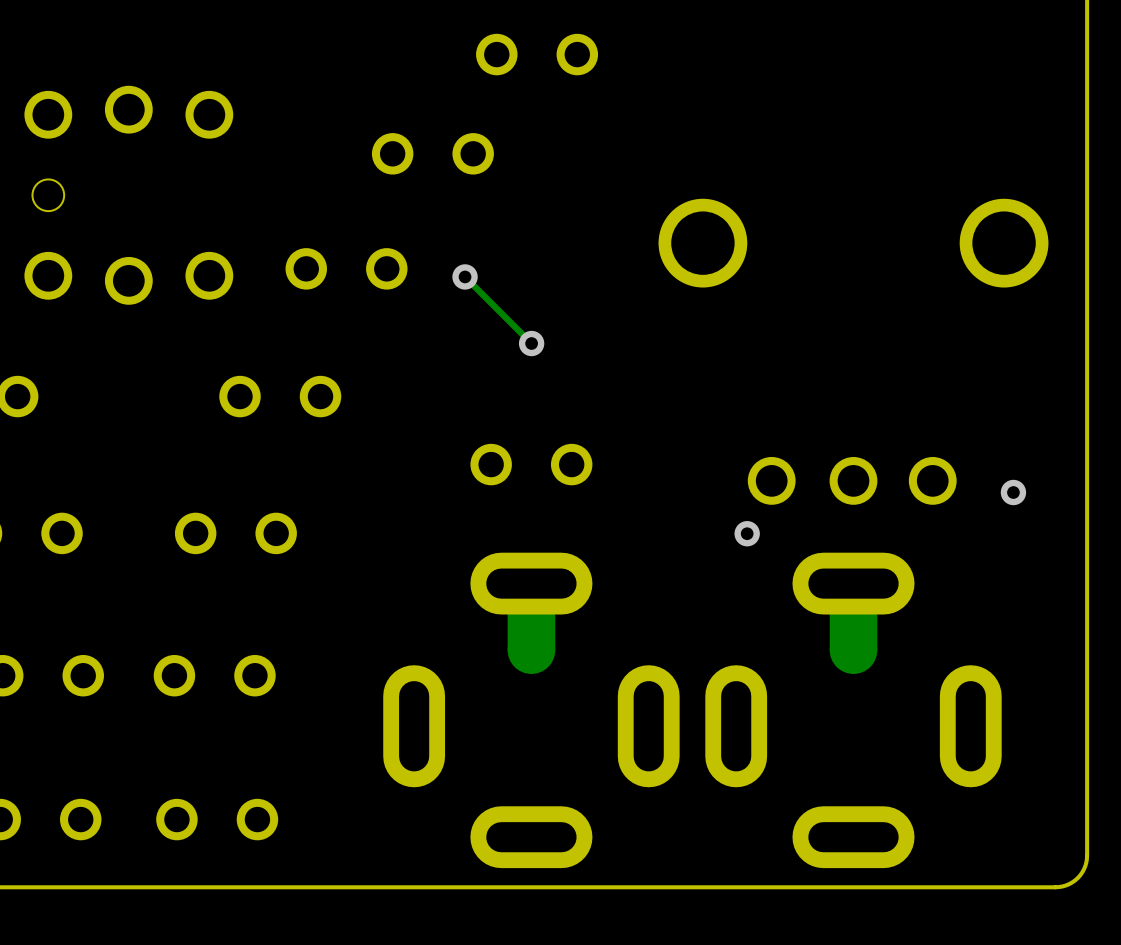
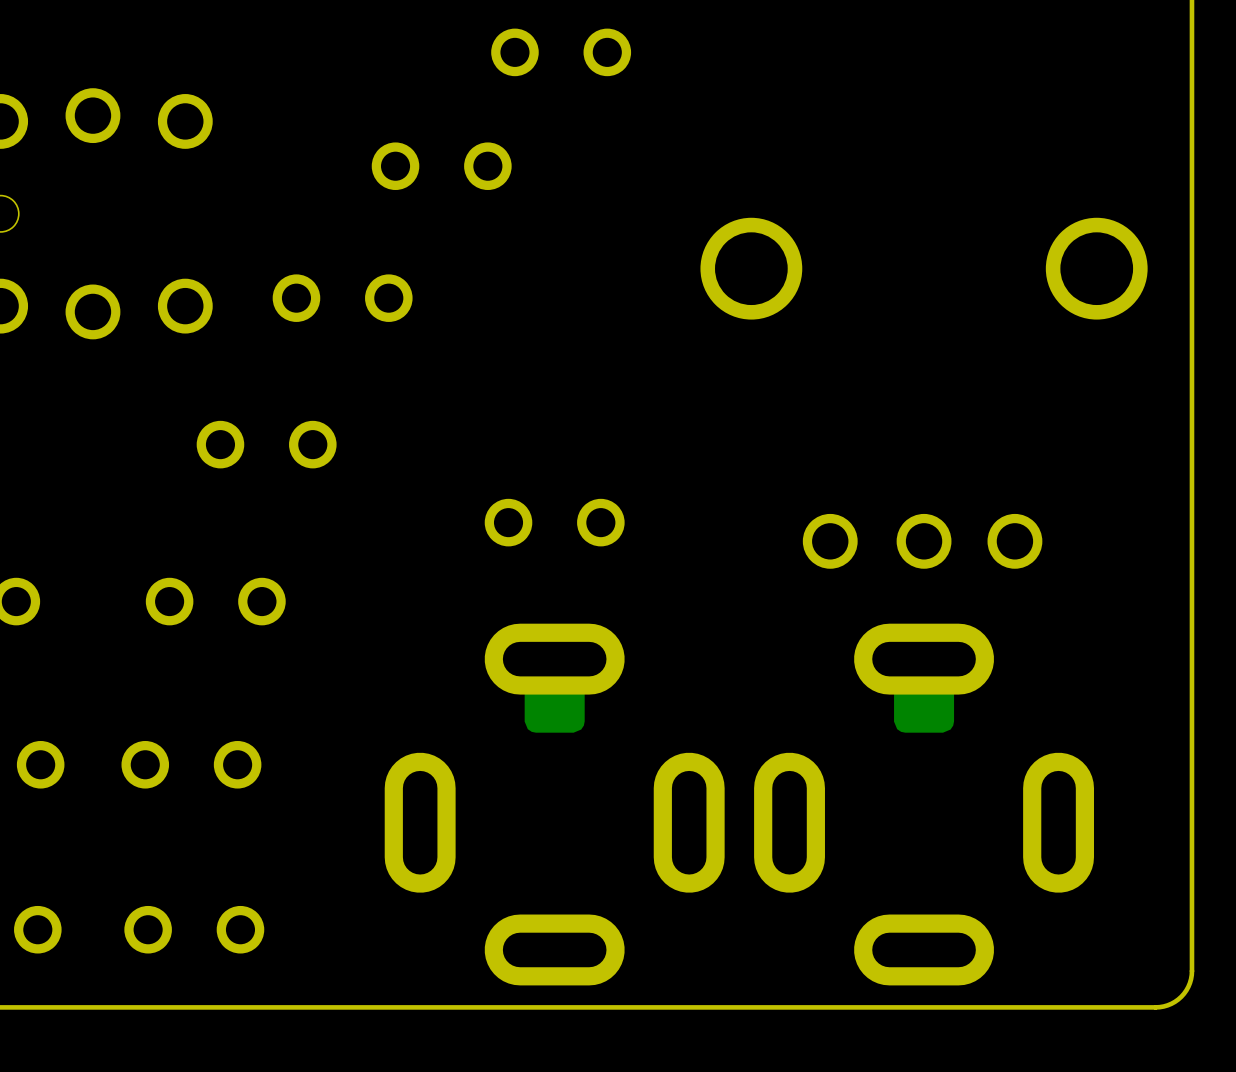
track: (465, 276) (531, 343) -> none
via: (465, 276) -> none
via: (531, 343) -> none
via: (1013, 492) -> none
via: (747, 533) -> none
part footprint: [383, 552, 680, 869] -> [384, 623, 725, 986]
part footprint: [705, 552, 1002, 869] -> [754, 623, 1095, 986]

